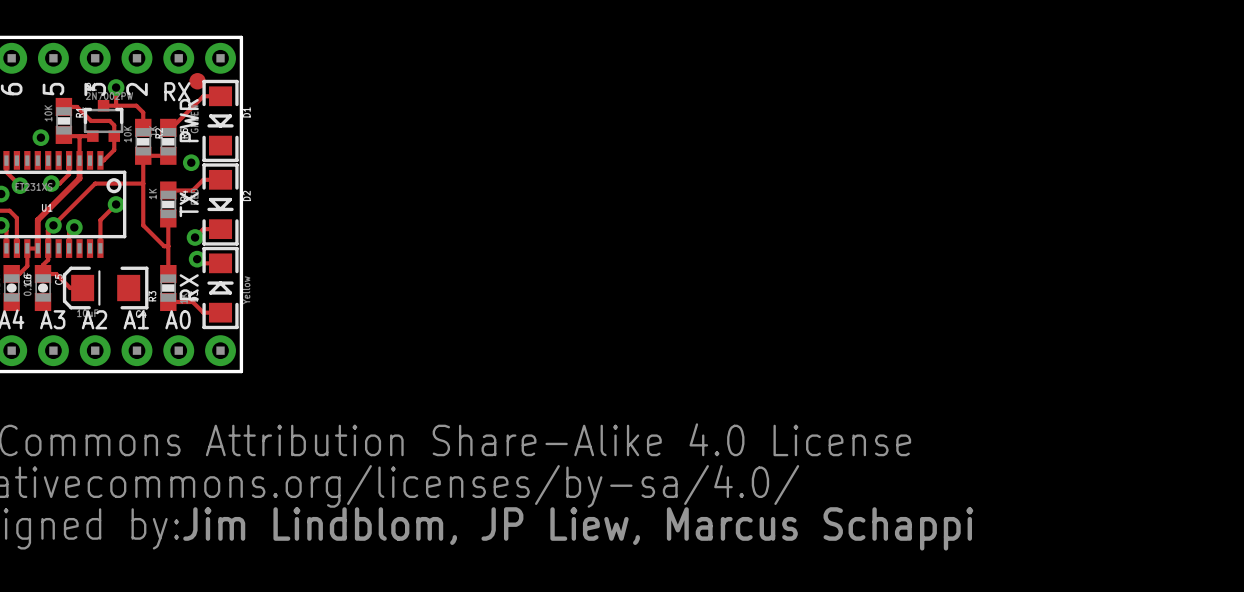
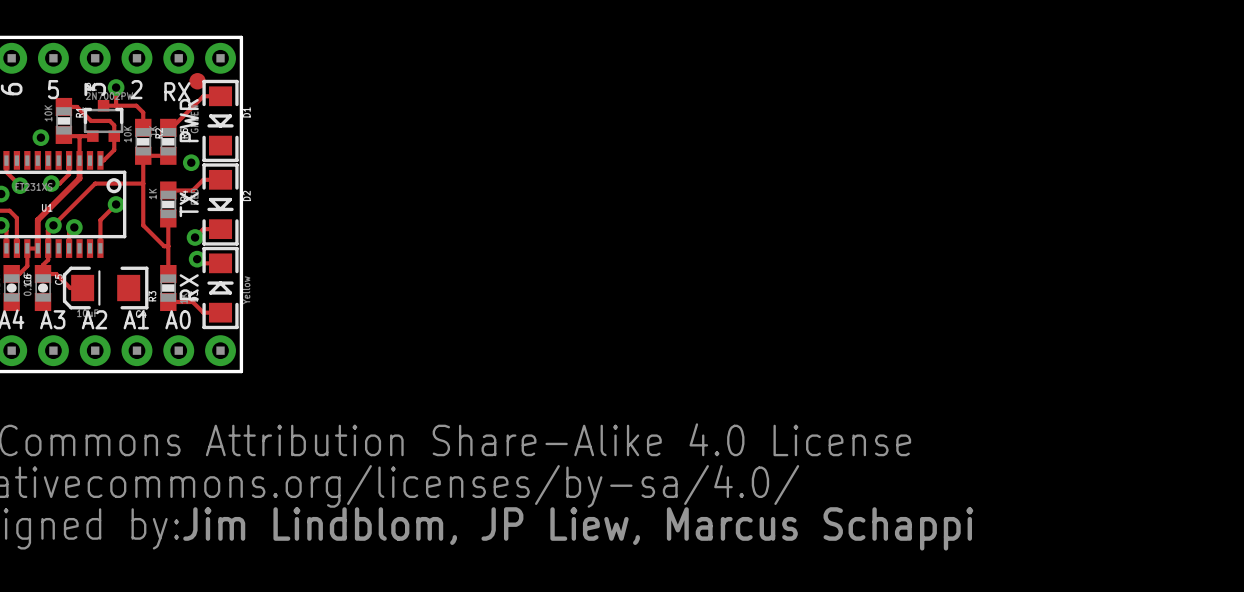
text rotation: 0° (53, 89) -> 90° clockwise (53, 89)
text rotation: 0° (136, 89) -> 90° clockwise (136, 89)

